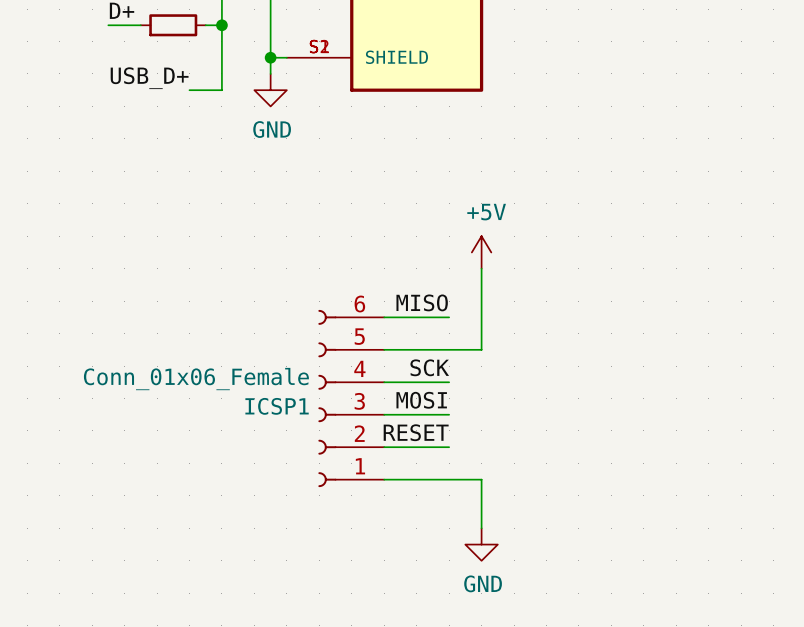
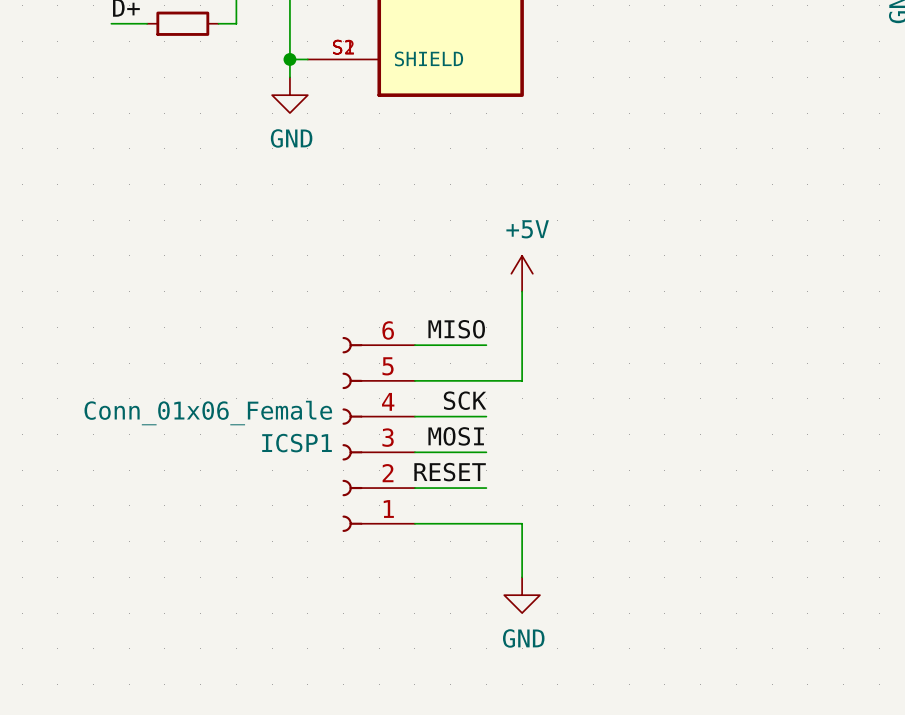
wire: (221, 25) (221, 90) (189, 90) -> none
junction: (221, 25) -> none
label: USB_D+ (149, 78) -> none

